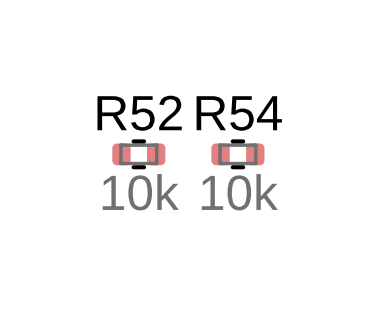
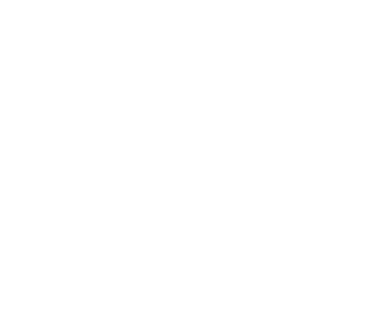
R52: 10k (138, 154) -> none
R54: 10k (237, 154) -> none

